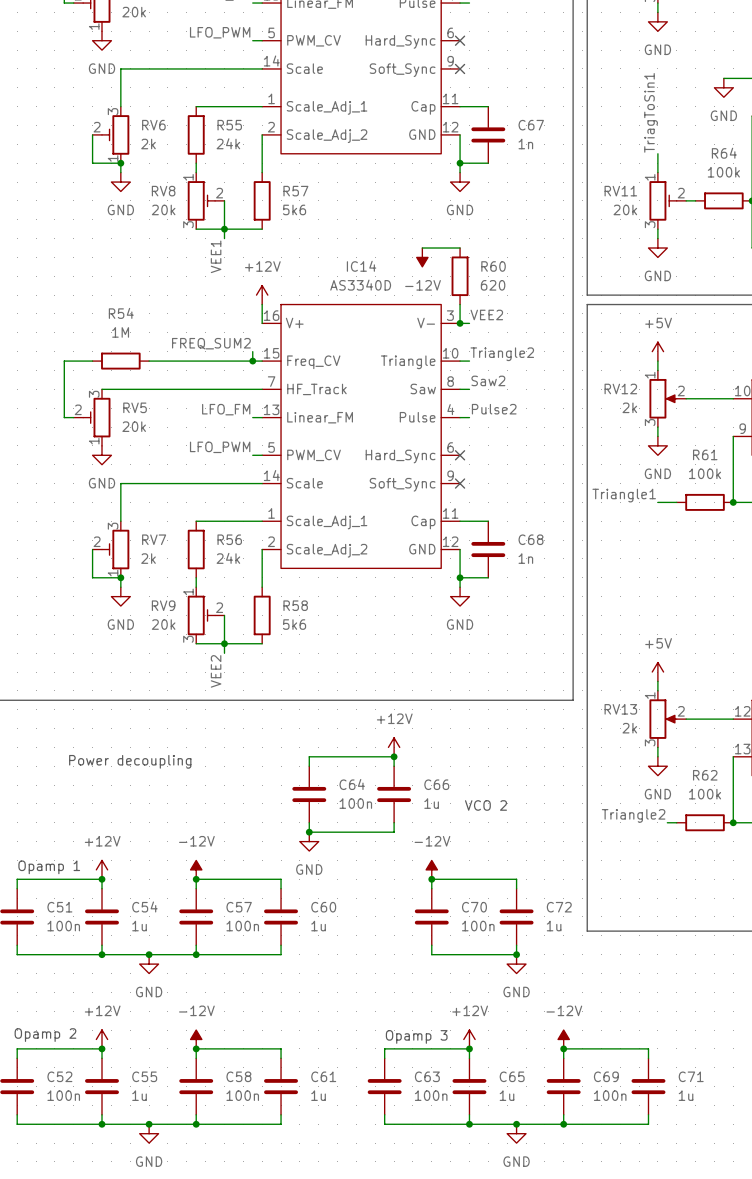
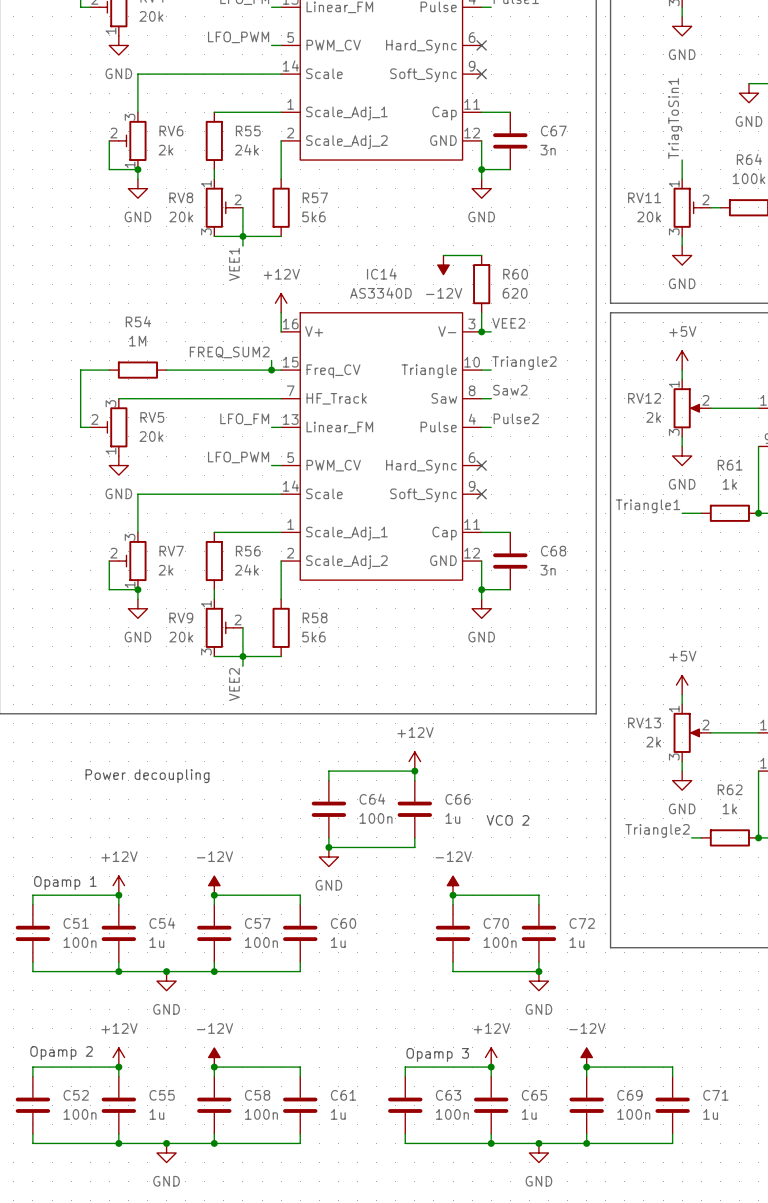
C67 value: 1n (525, 144) -> 3n (548, 150)
R61 value: 100k (705, 473) -> 1k (729, 484)
C68 value: 1n (525, 558) -> 3n (548, 570)
R62 value: 100k (705, 794) -> 1k (729, 808)

